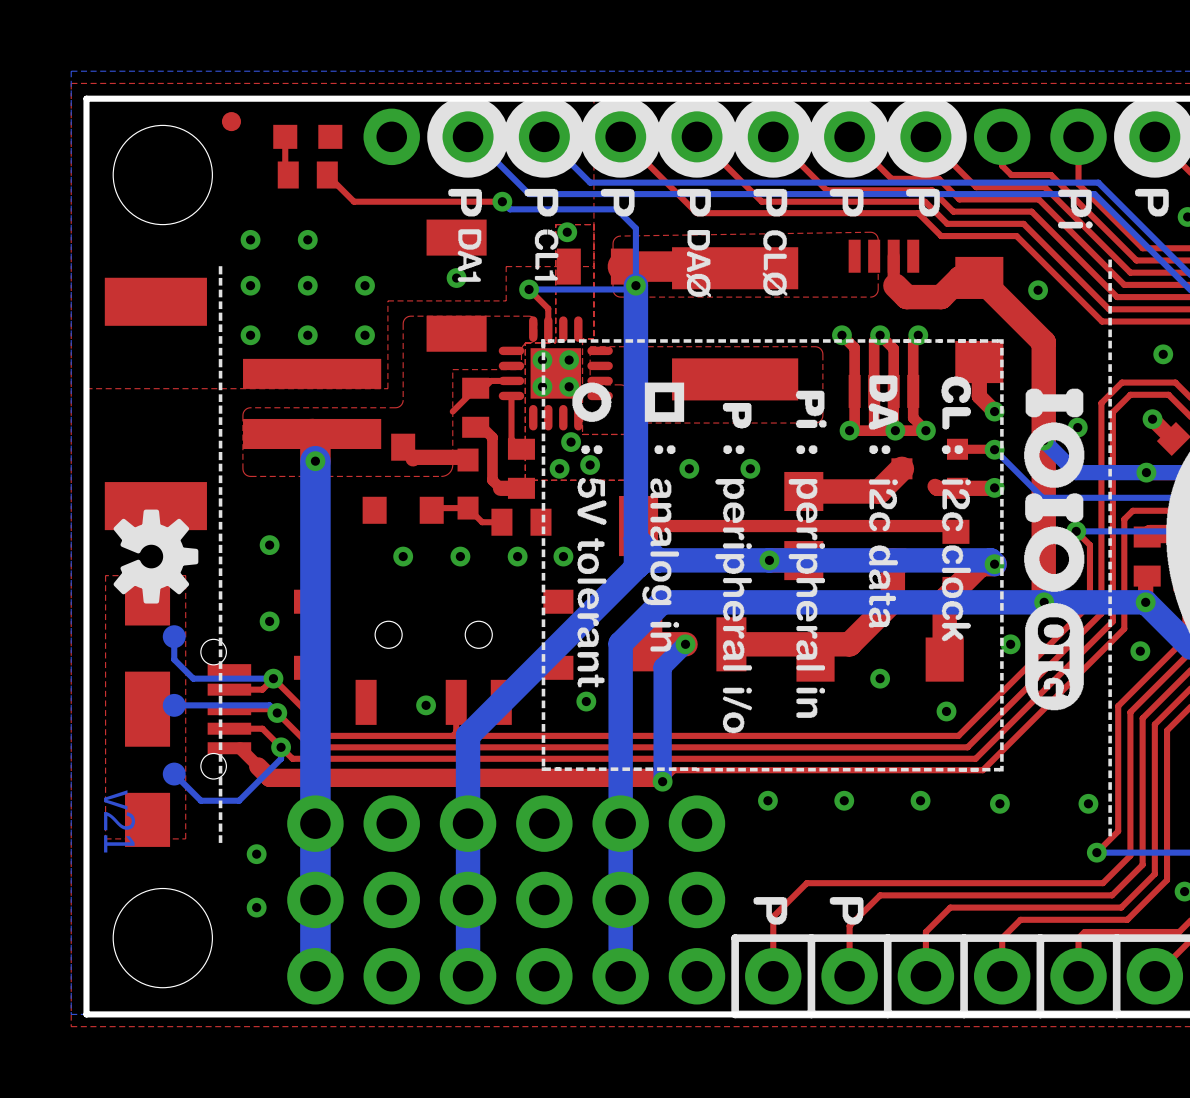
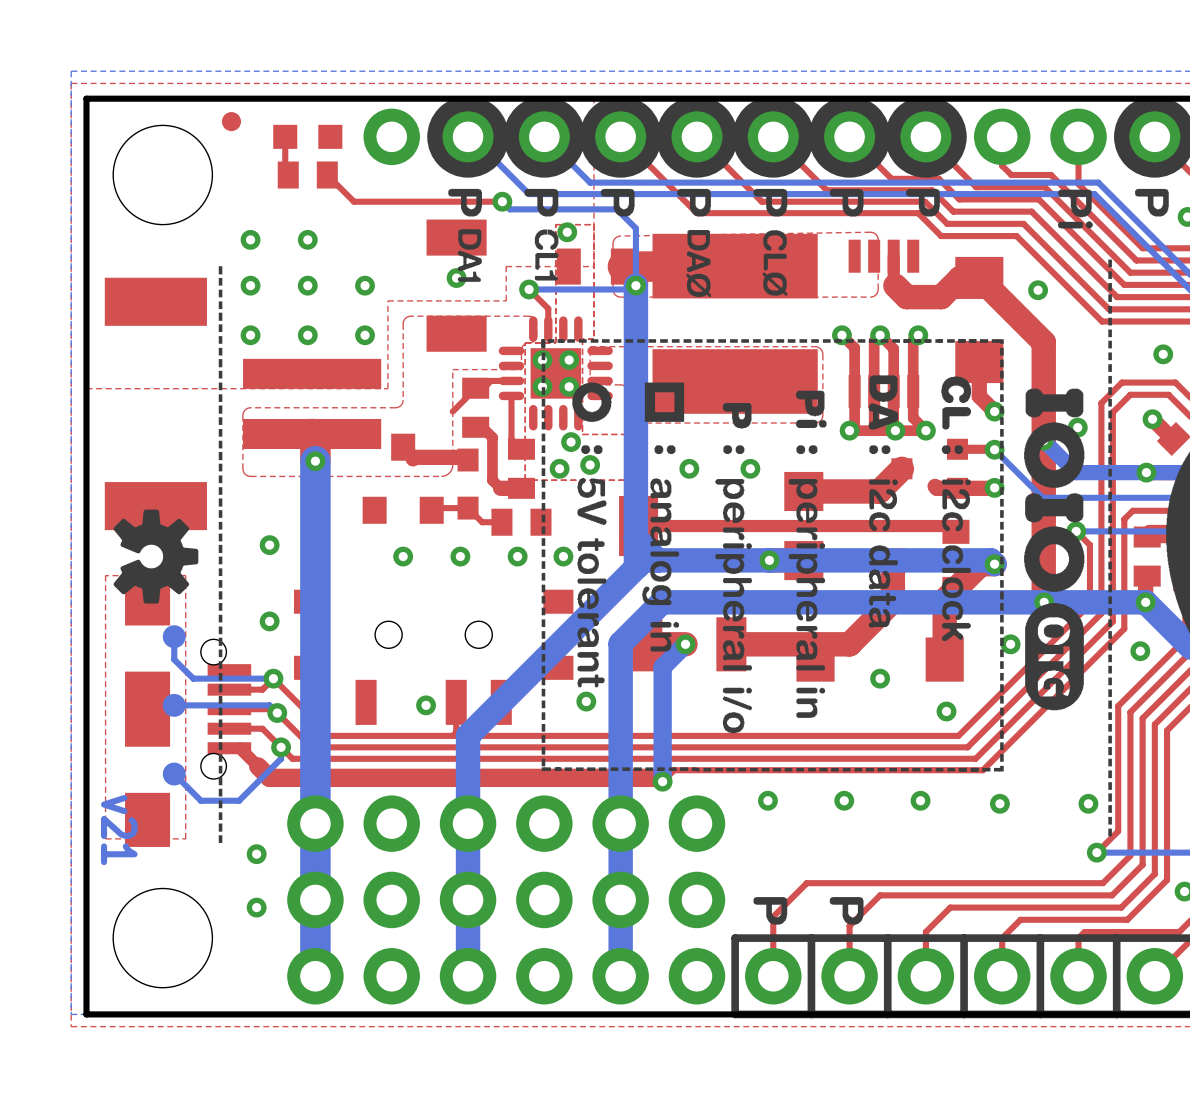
part footprint: [672, 247, 799, 401] -> [652, 233, 818, 414]

